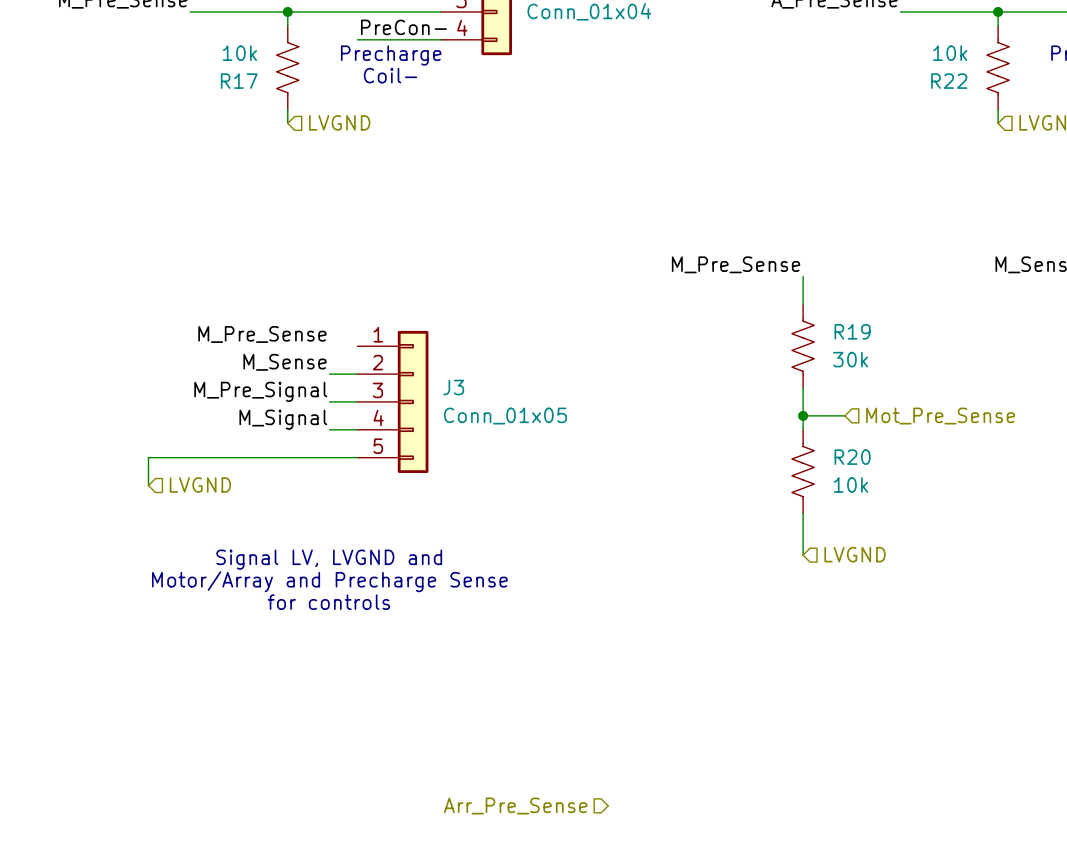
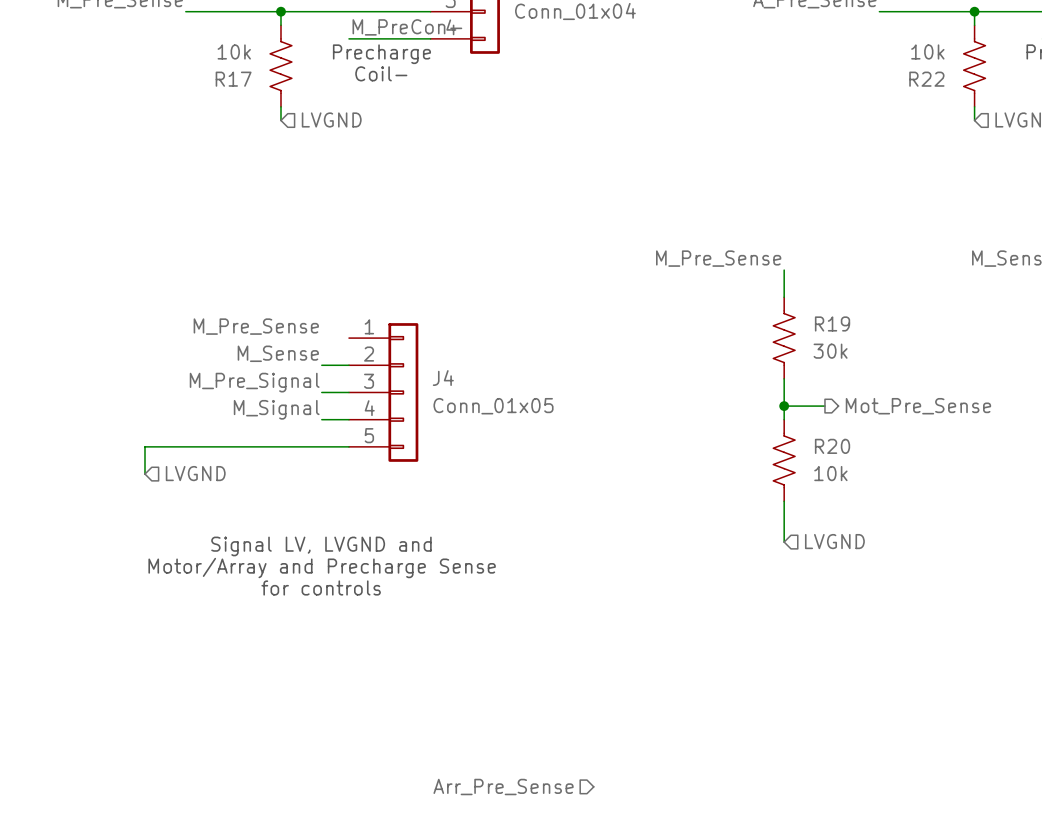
label: PreCon- (403, 27) -> M_PreCon- (407, 27)
J3 name: J3 (453, 387) -> J4 (443, 378)
hierarchical label shape: input (940, 416) -> output (918, 406)

